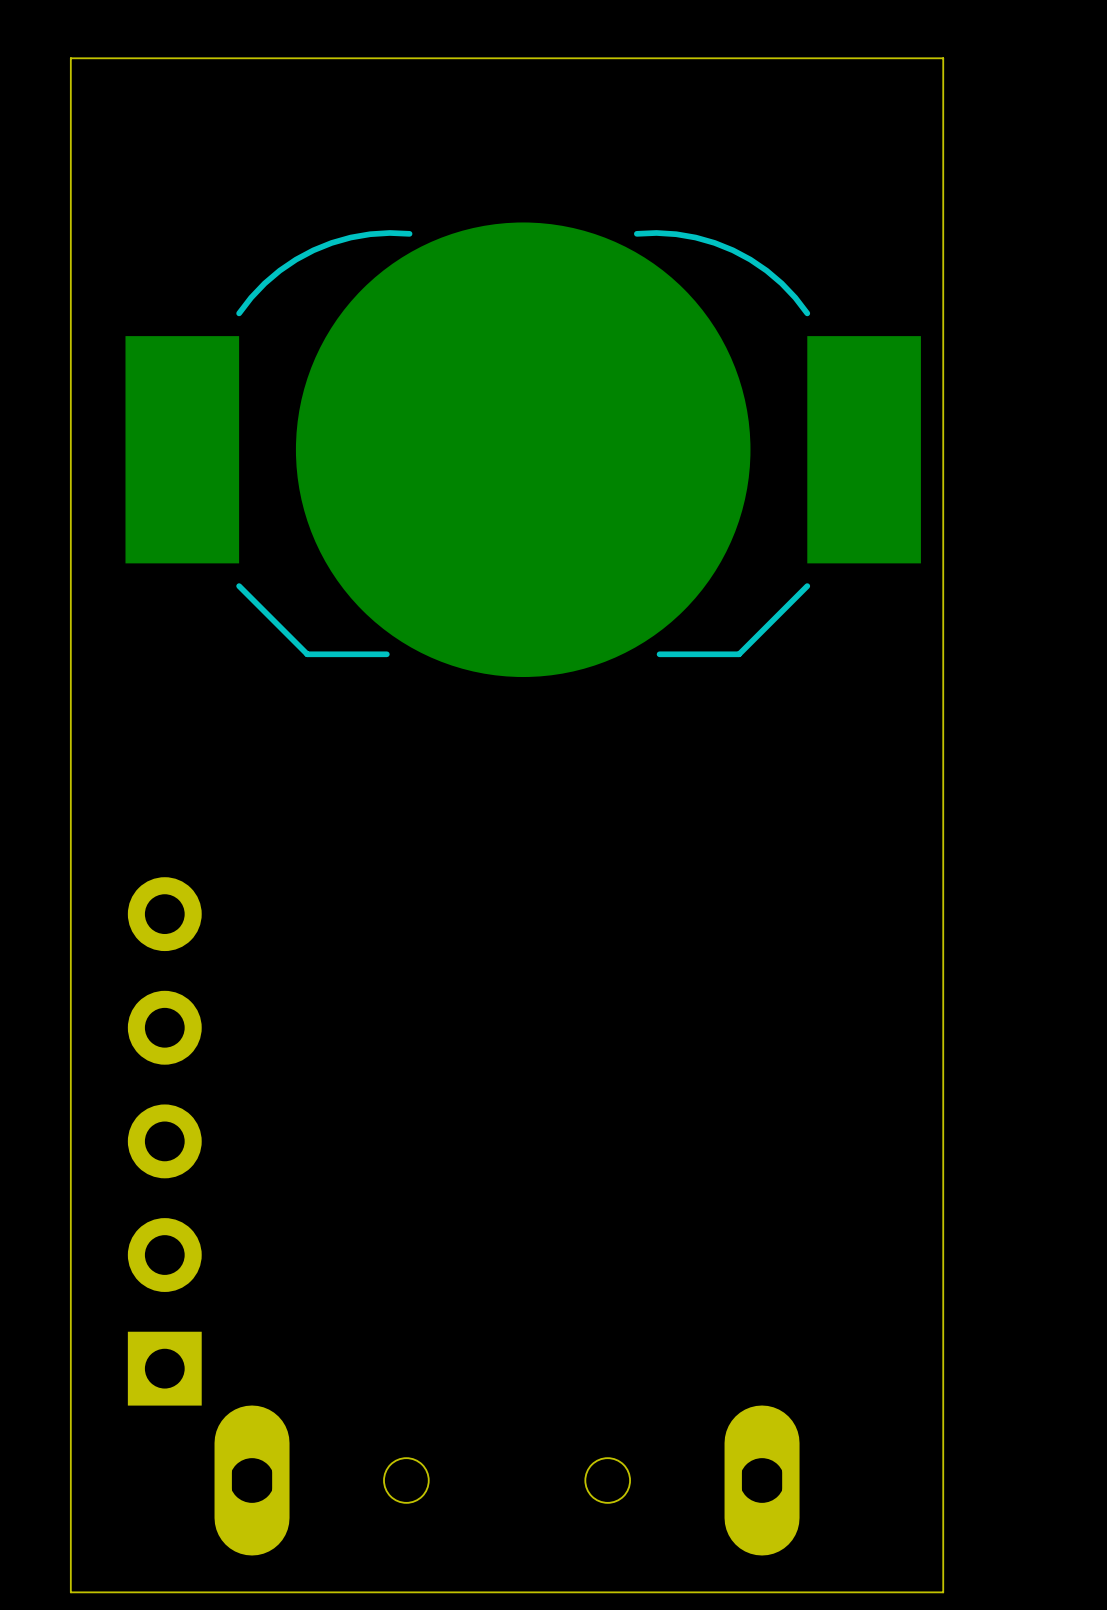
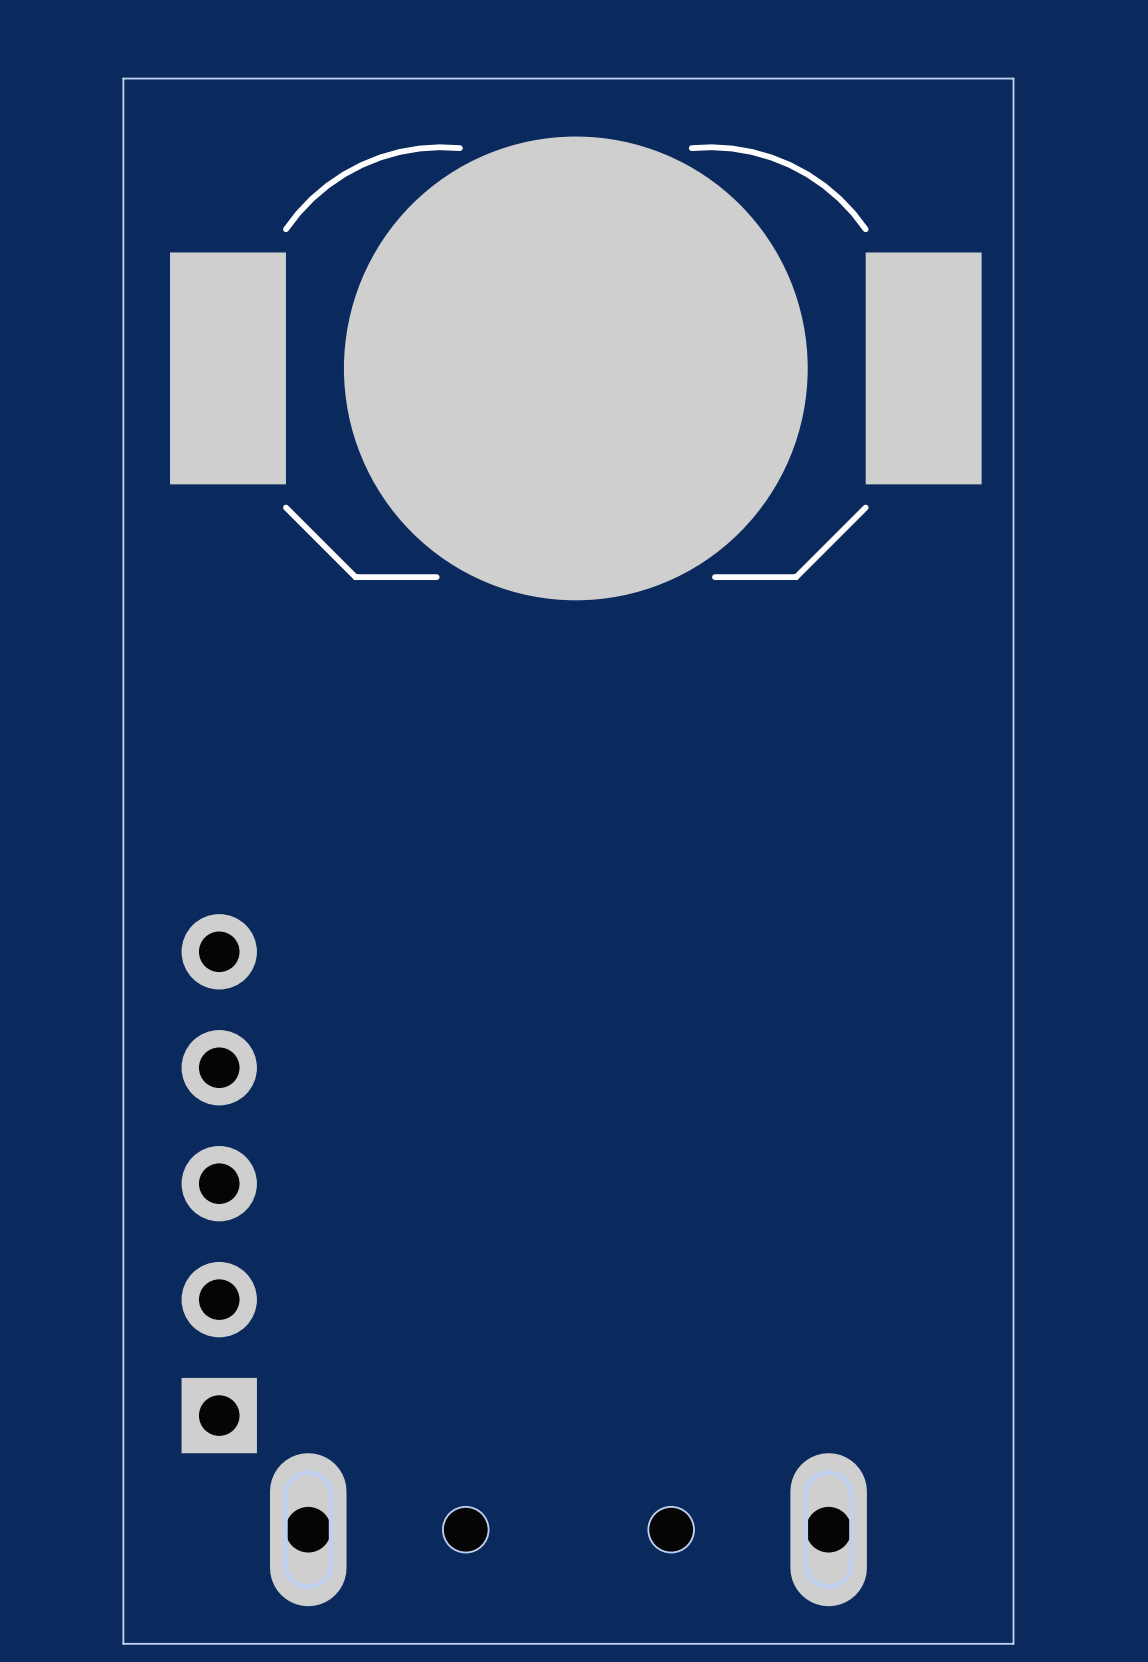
part position: (523, 449) -> (575, 368)

